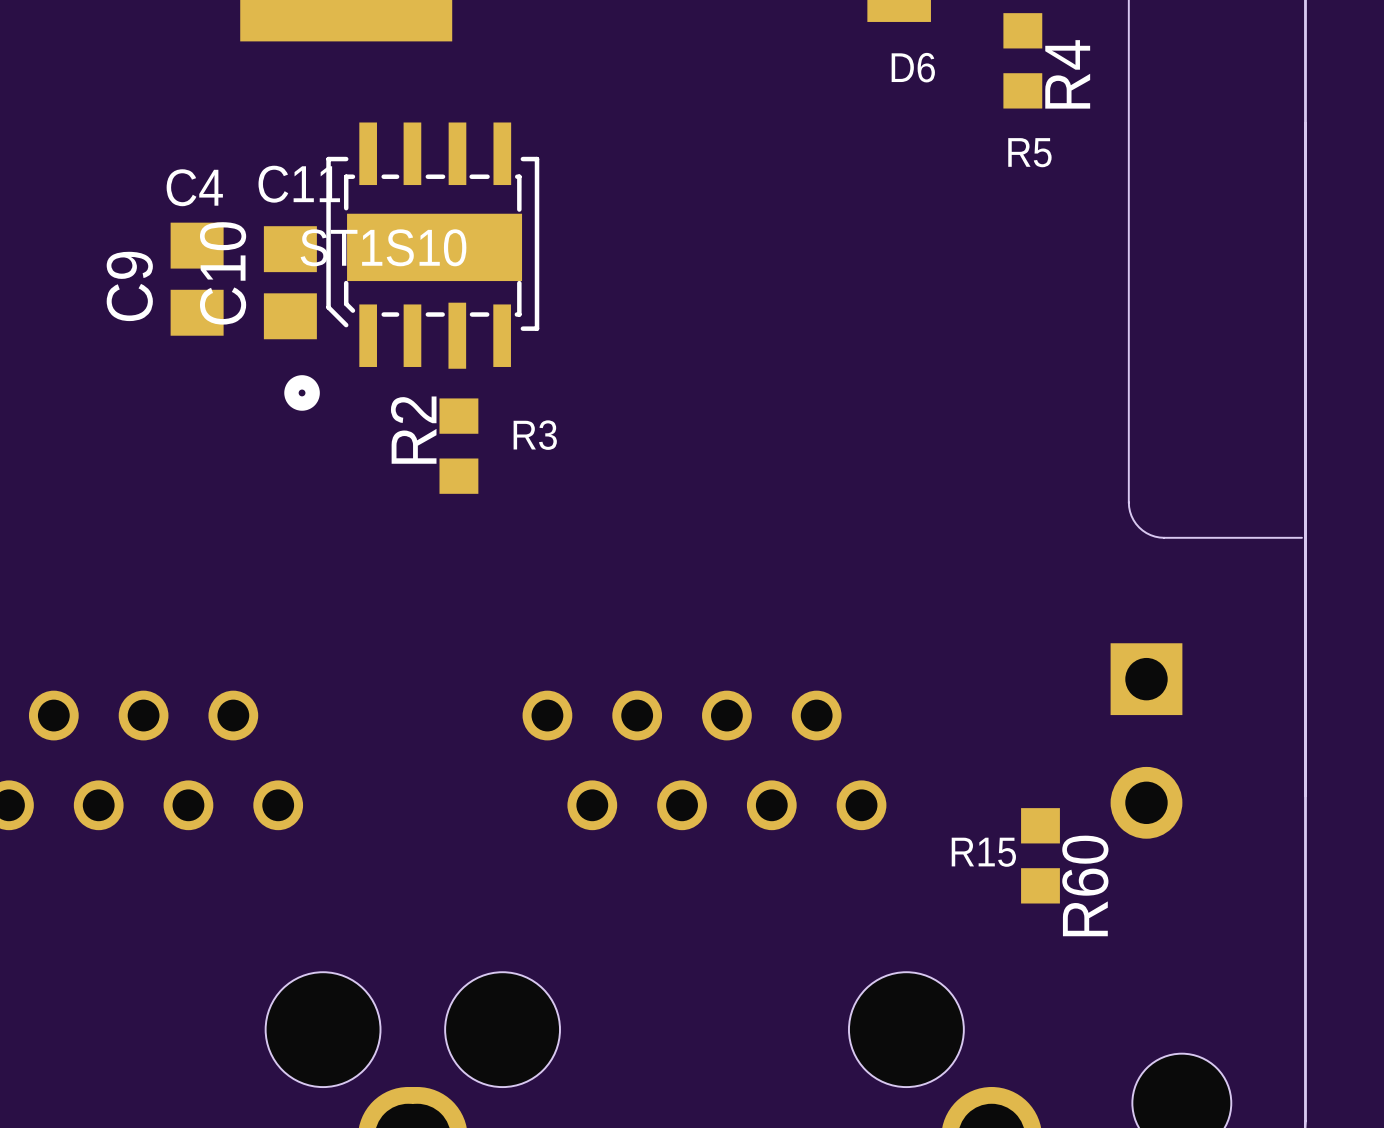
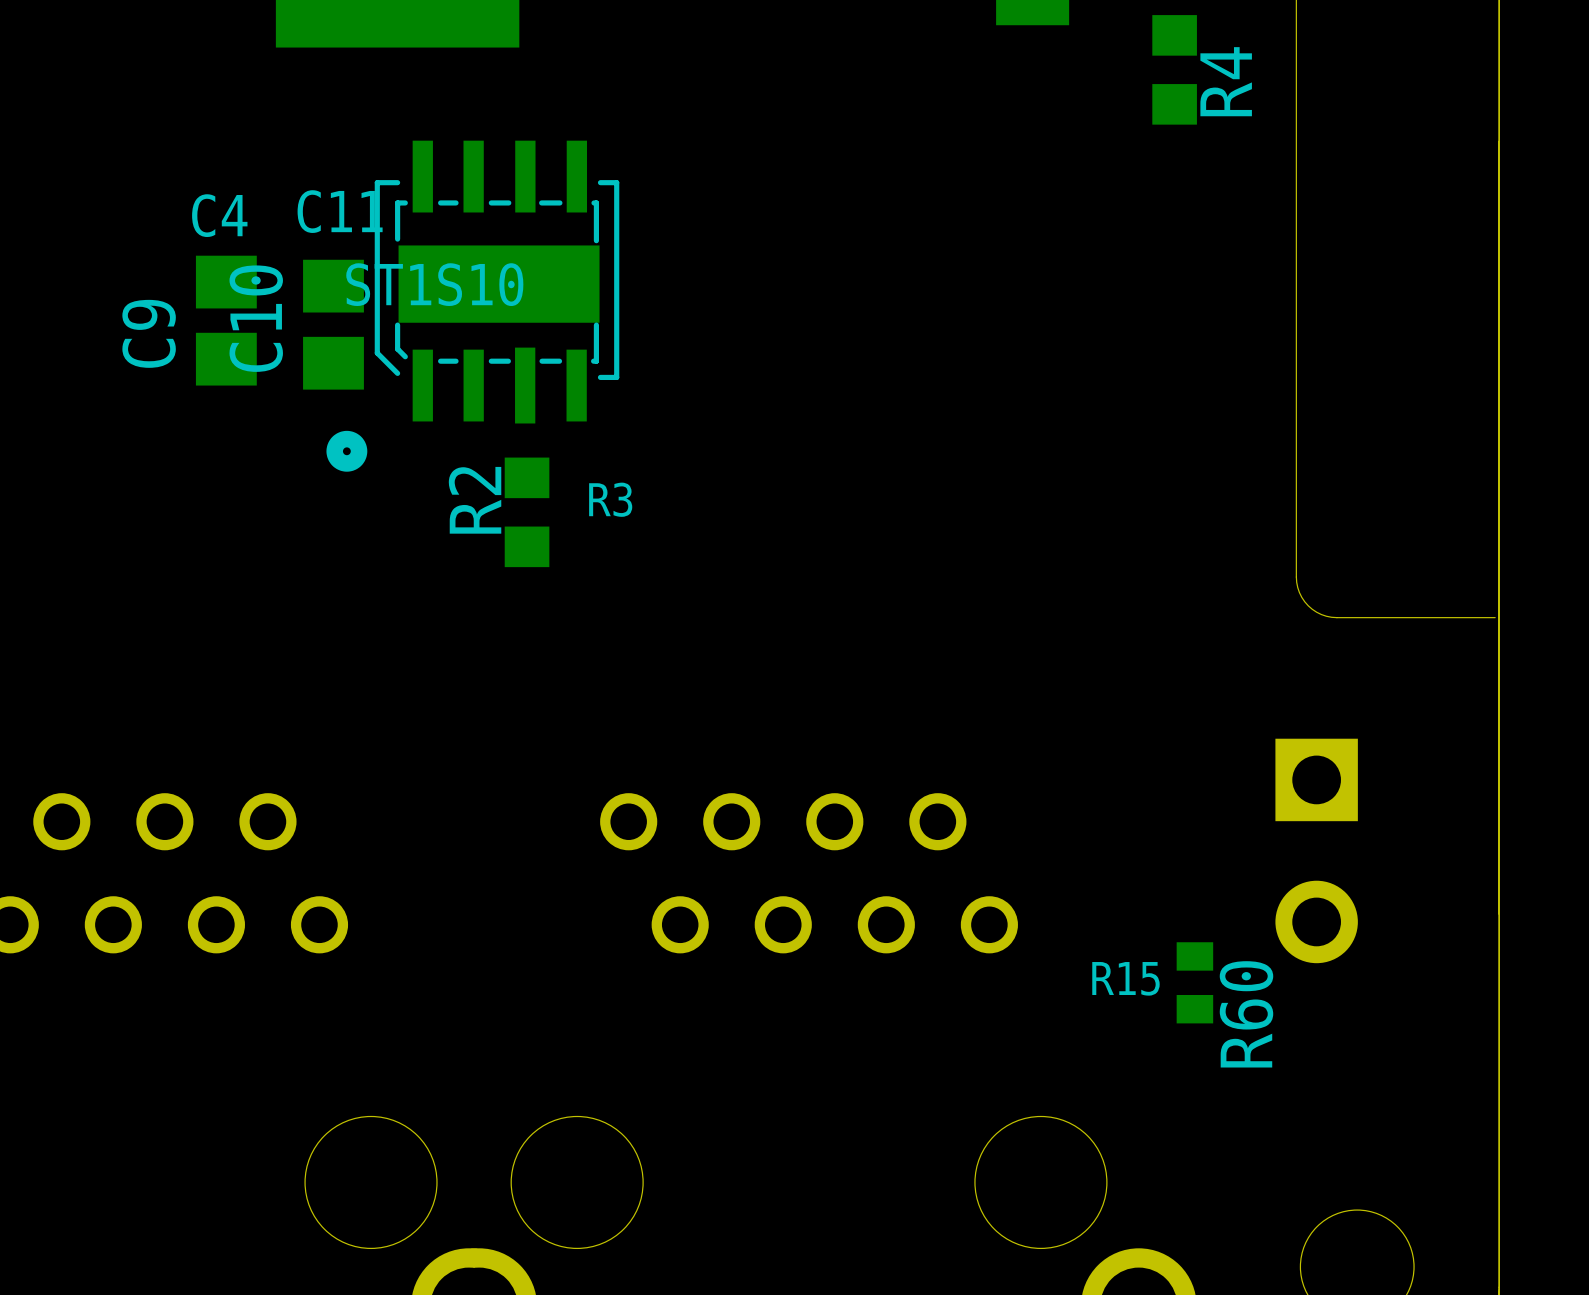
text: D6 (913, 67) -> none
text: R5 (1029, 152) -> none
R60 footprint: [1021, 808, 1060, 904] -> [1176, 942, 1214, 1024]

